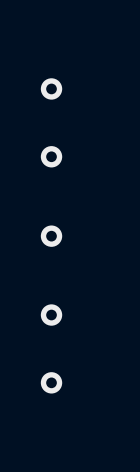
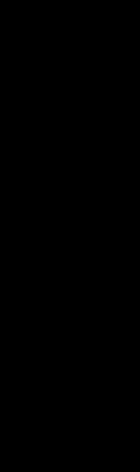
via: (51, 88) -> none
via: (51, 156) -> none
via: (51, 236) -> none
via: (51, 315) -> none
via: (51, 382) -> none

